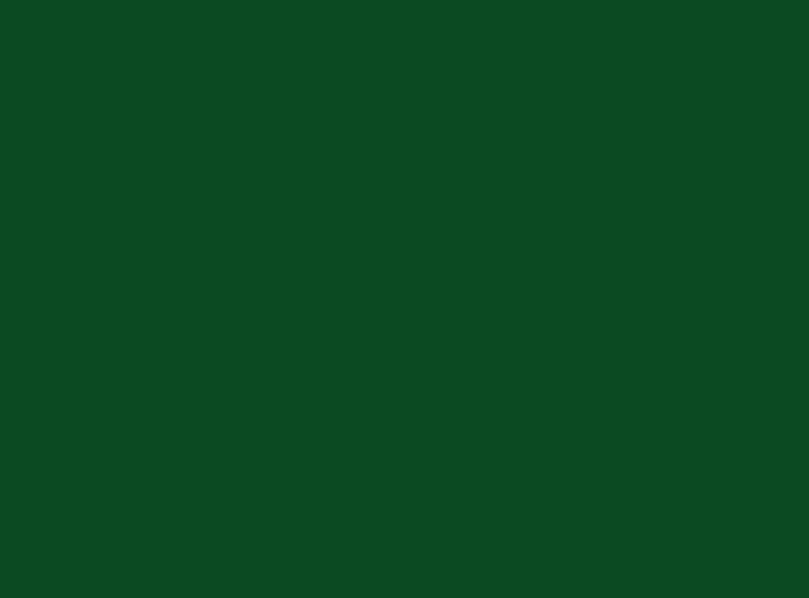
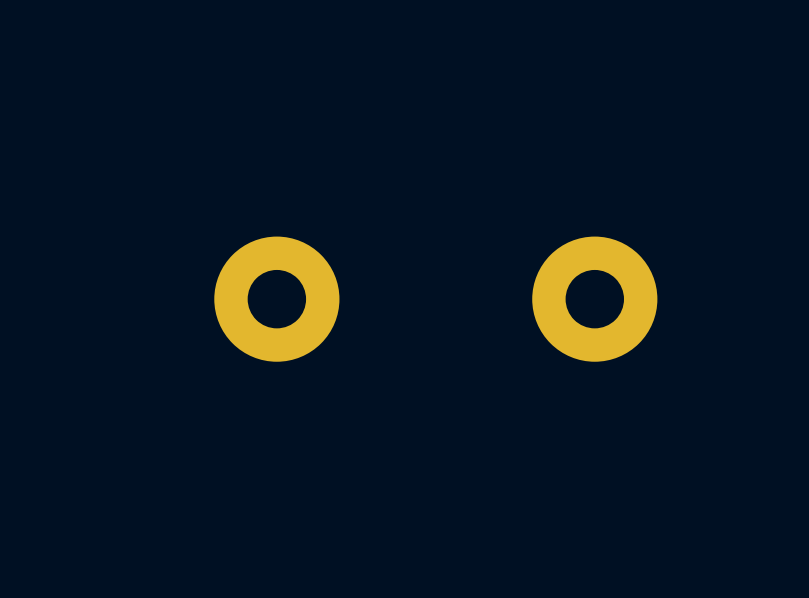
part: none -> (276, 299)
part: none -> (594, 299)

